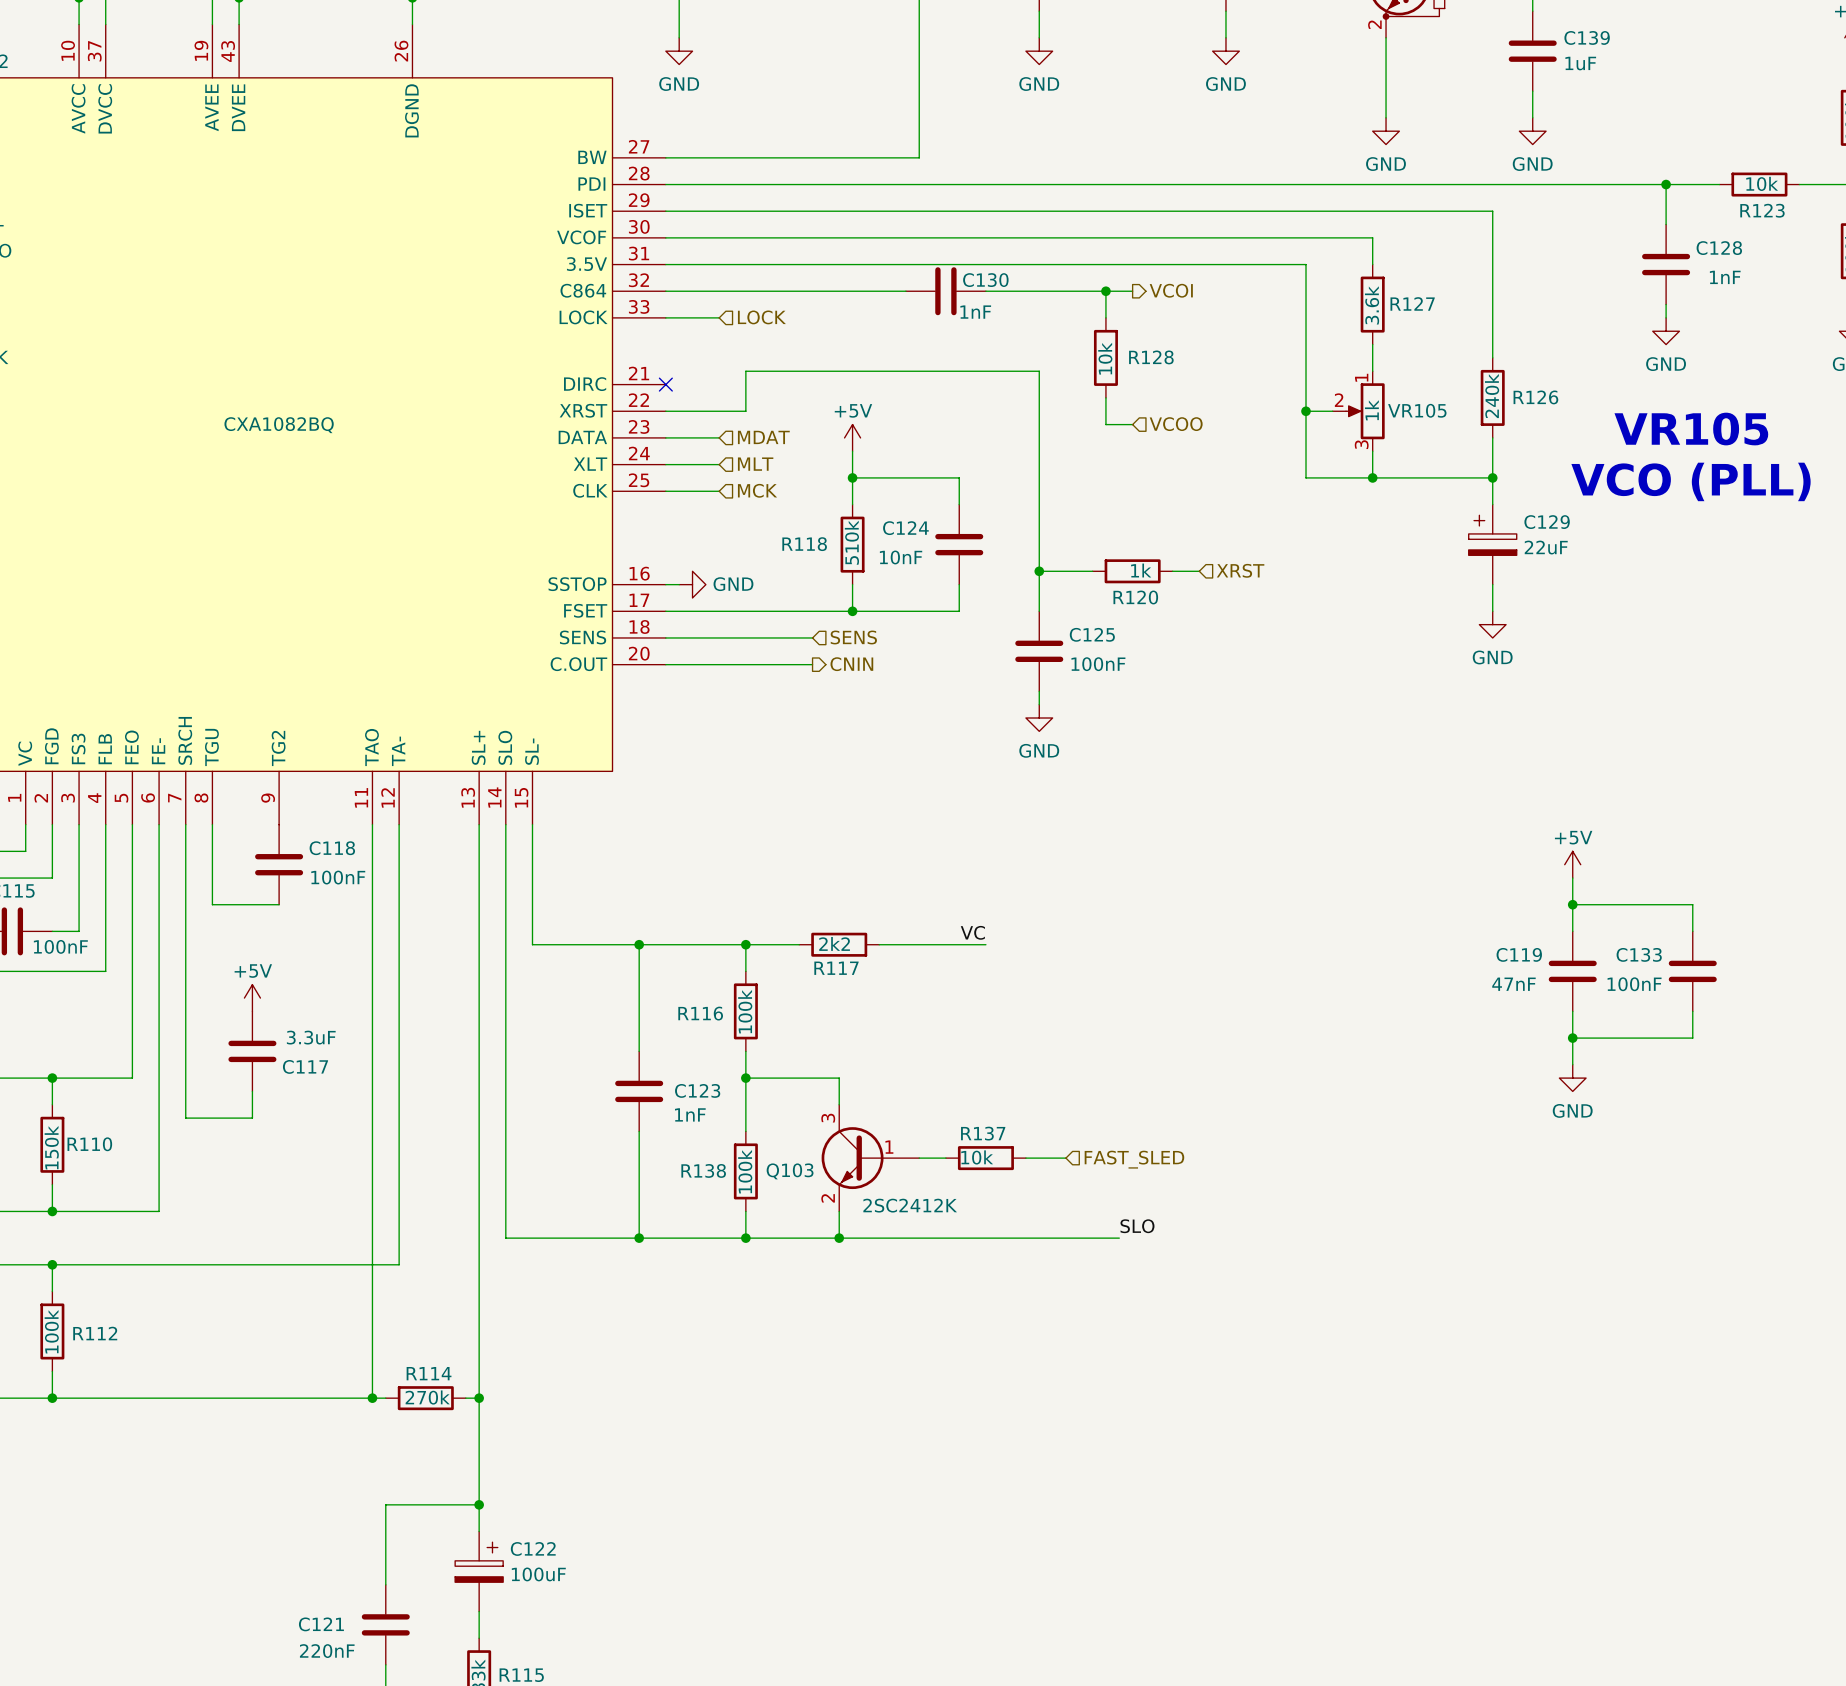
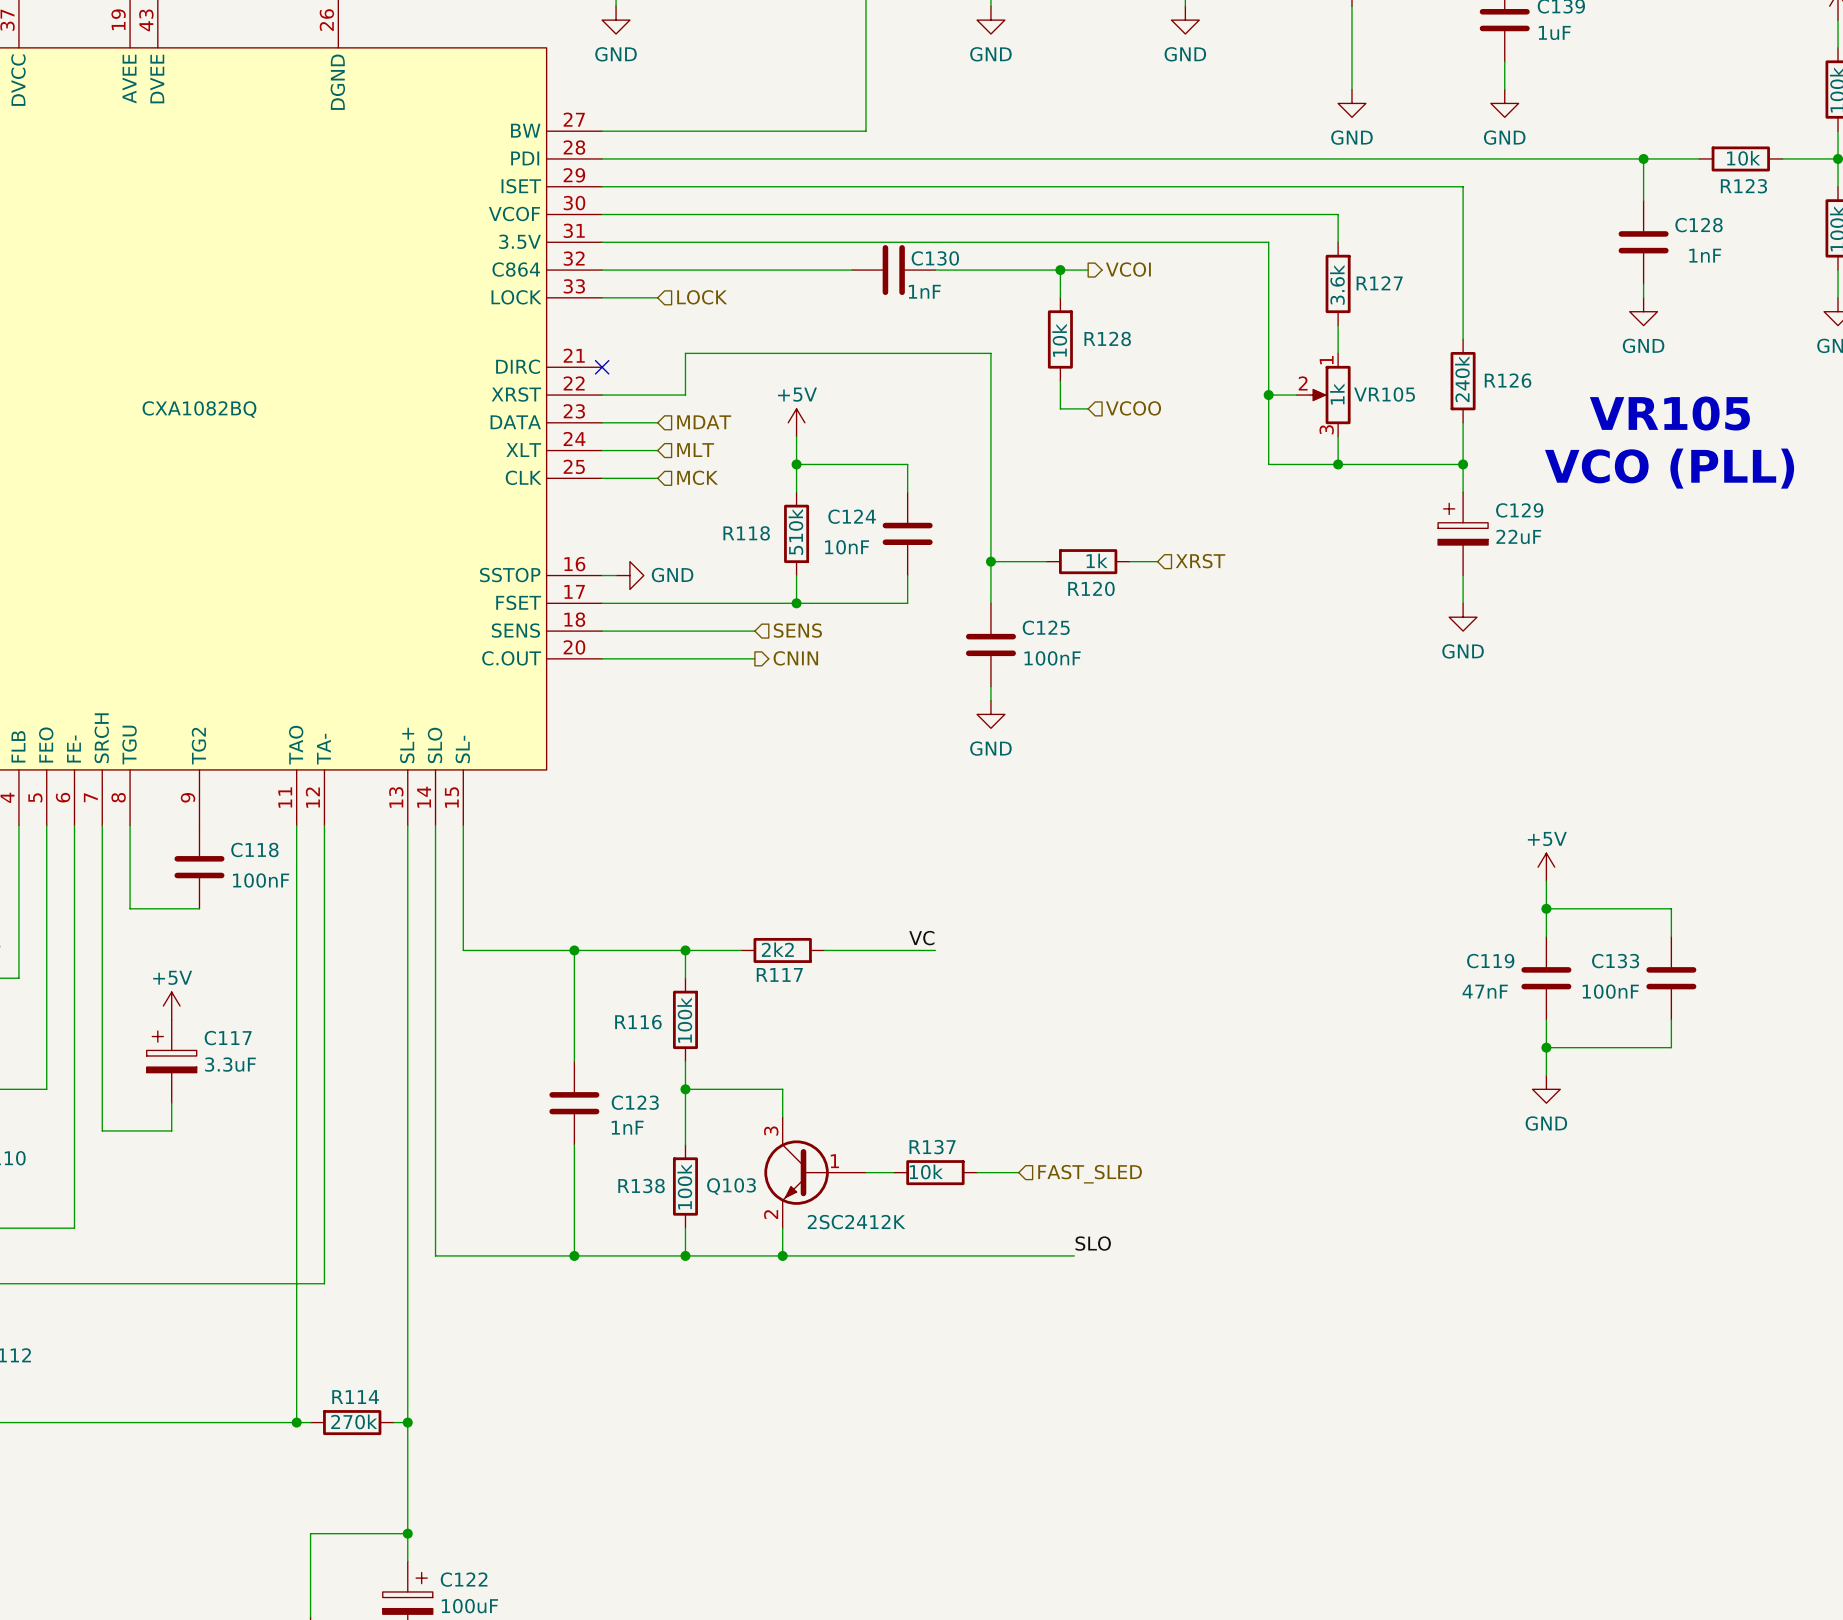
C117 symbol: [228, 1011, 277, 1092] -> [146, 1019, 197, 1104]
C117 name position: C117 (305, 1066) -> C117 (228, 1038)

